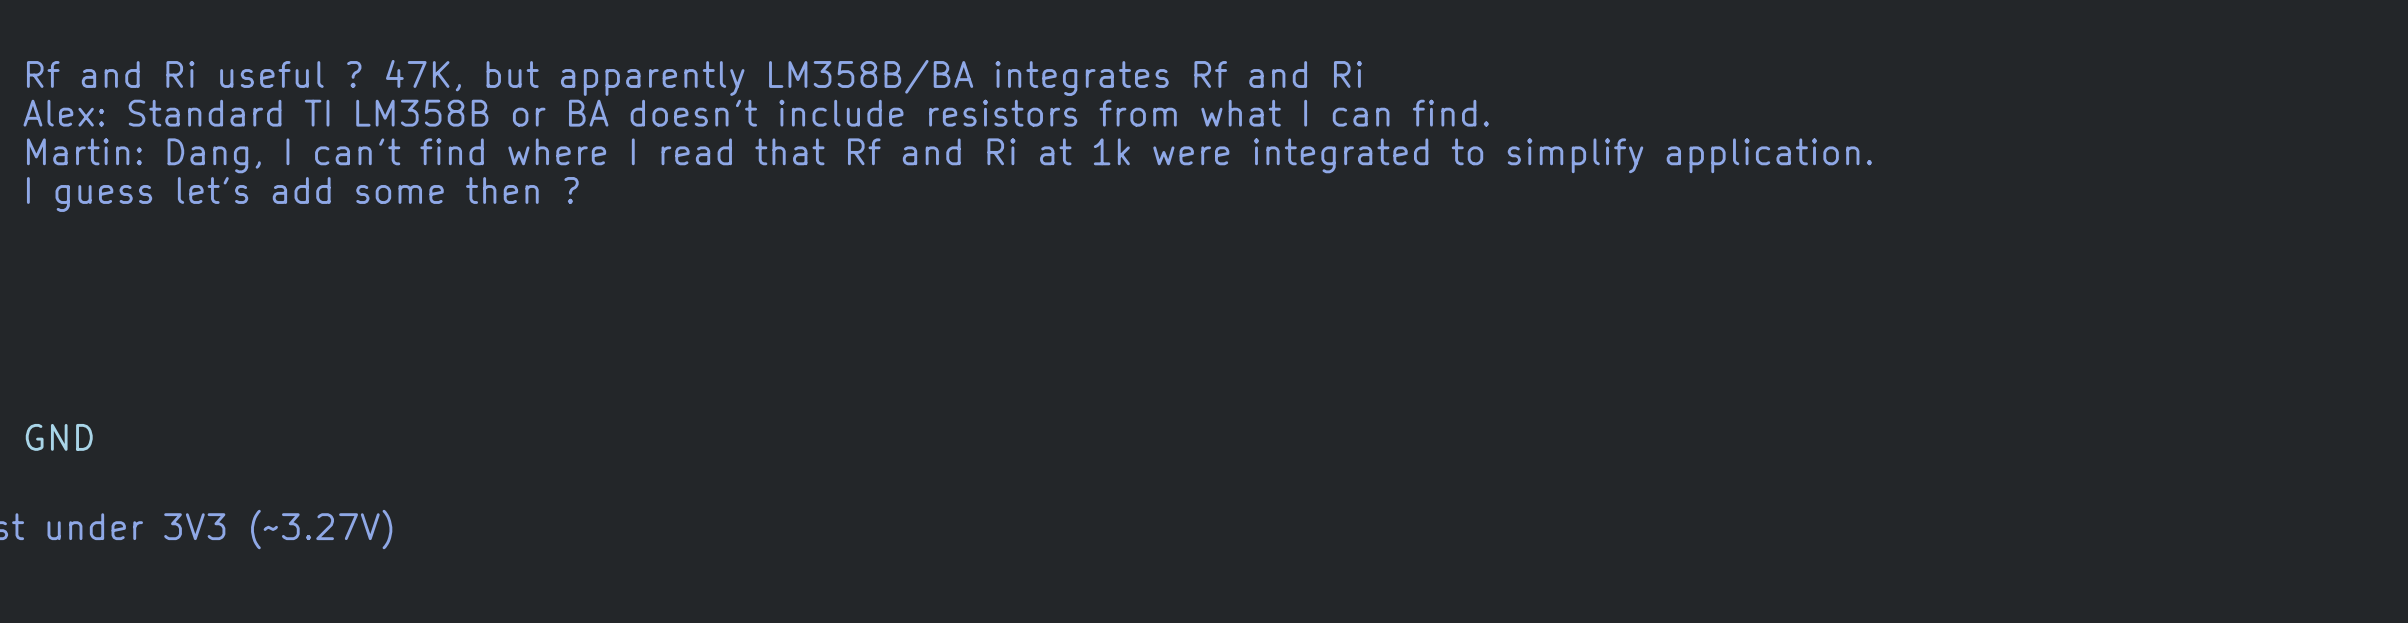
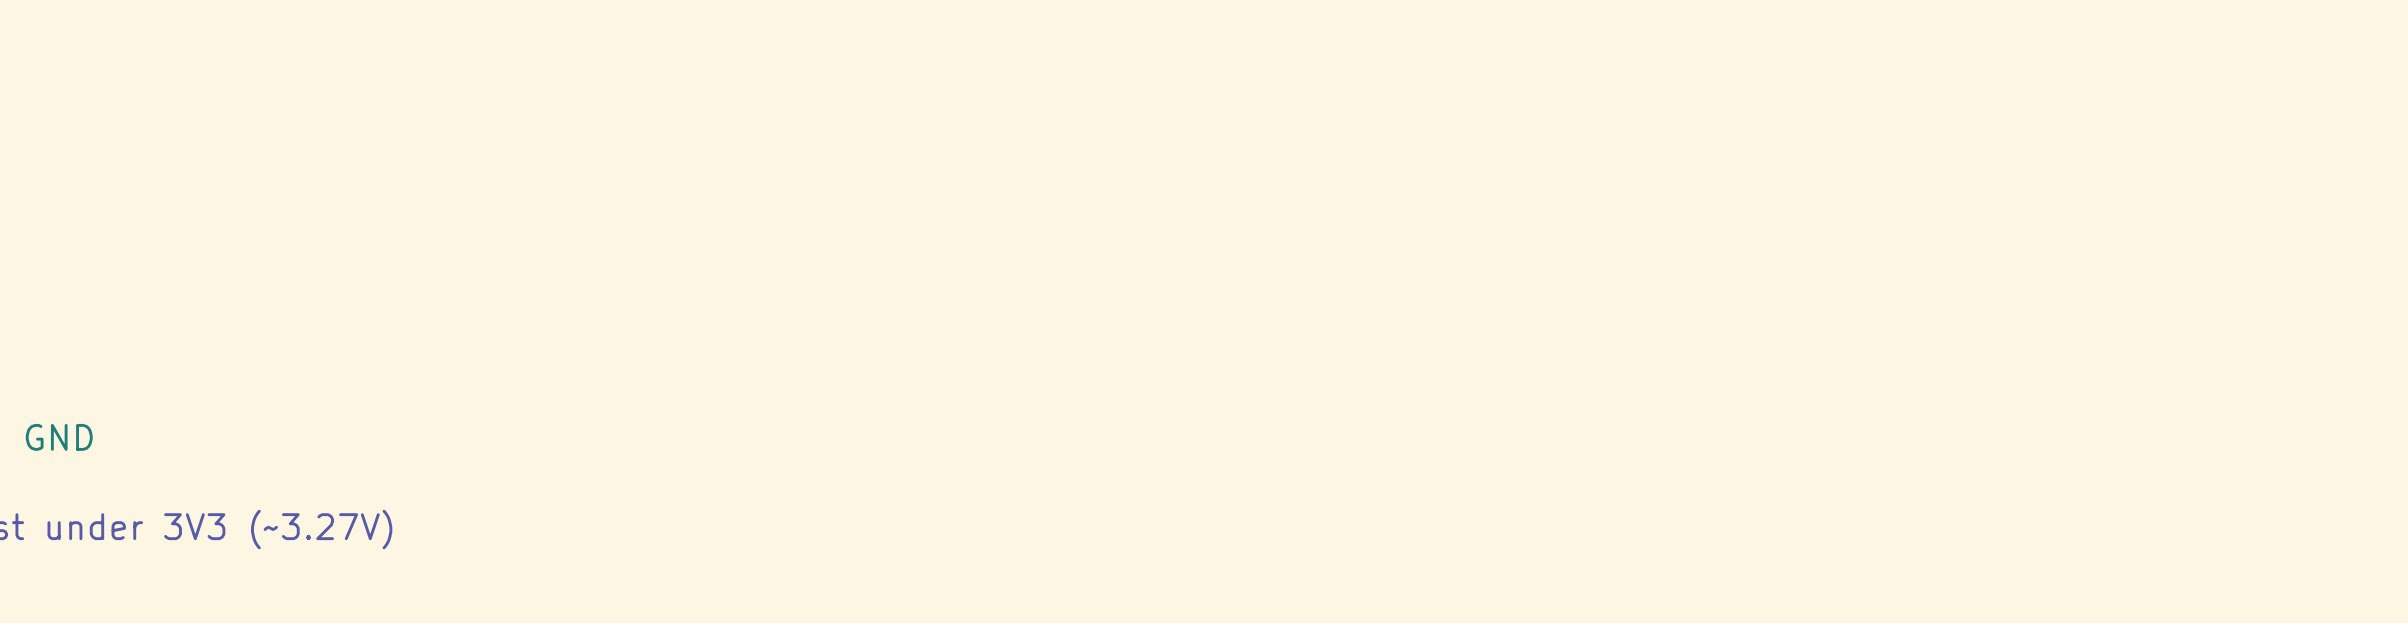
text: Rf and Ri useful ? 47K, but apparently LM358B/BA integrates Rf and Ri (694, 77) -> none
text: Alex: Standard TI LM358B or BA doesn't include resistors from what I can find. (756, 113) -> none
text: Martin: Dang, I can't find where I read that Rf and Ri at 1k were integrated to simplify application. (949, 155) -> none
text: I guess let's add some then ? (302, 194) -> none

